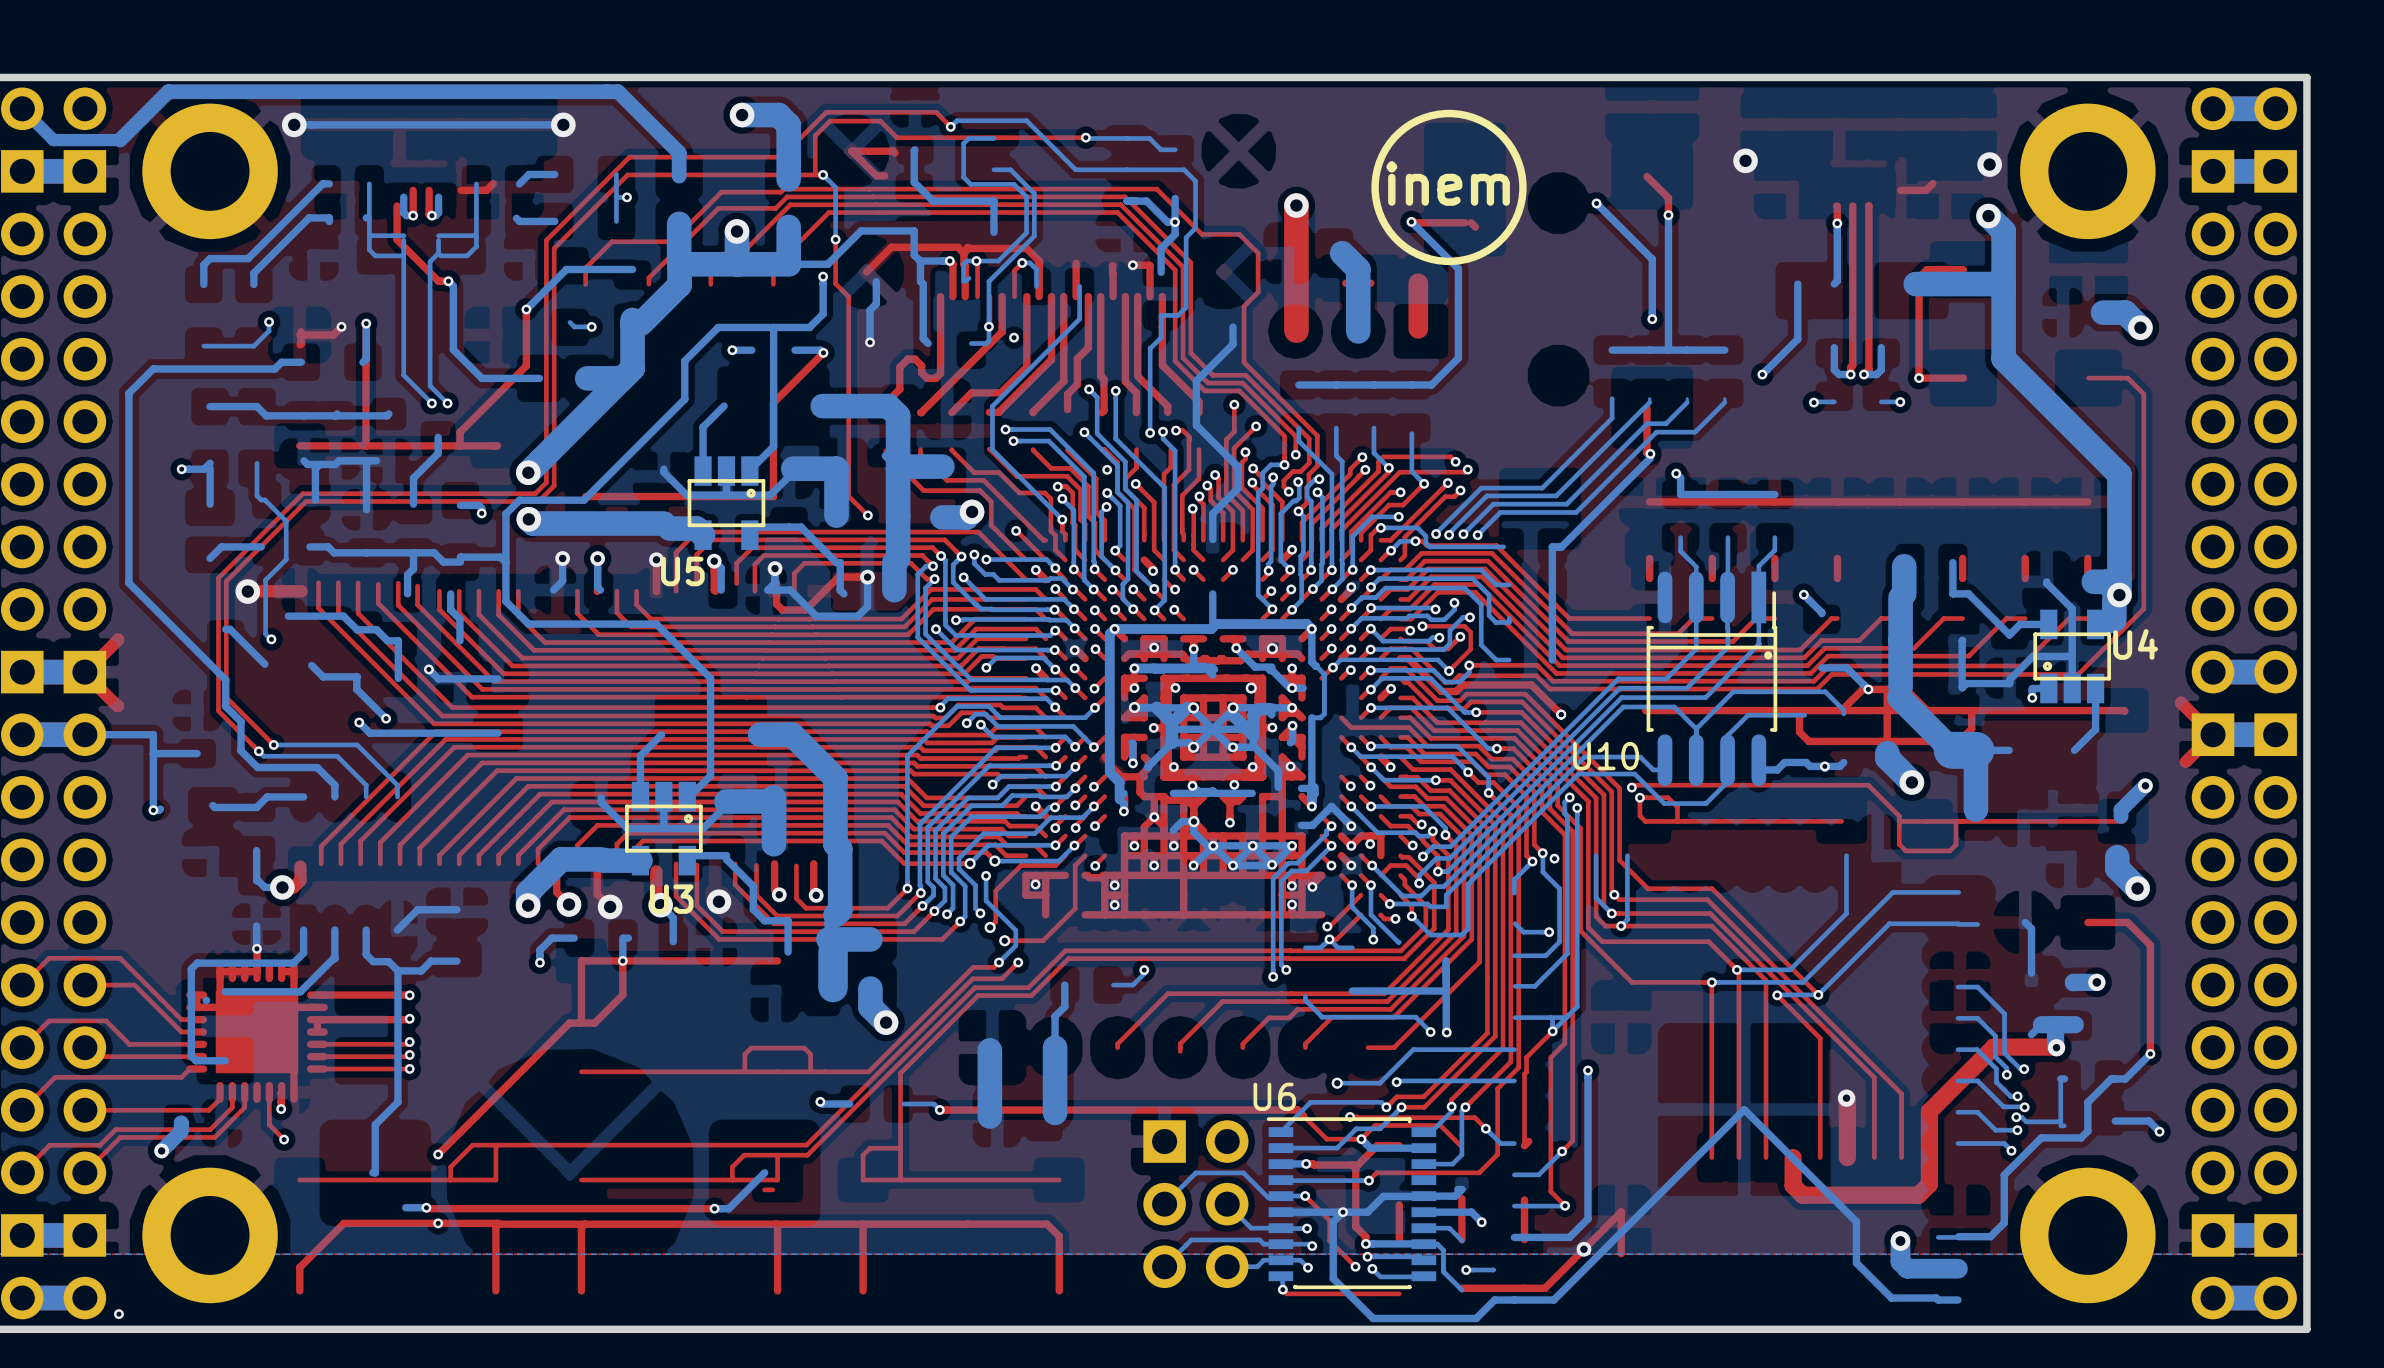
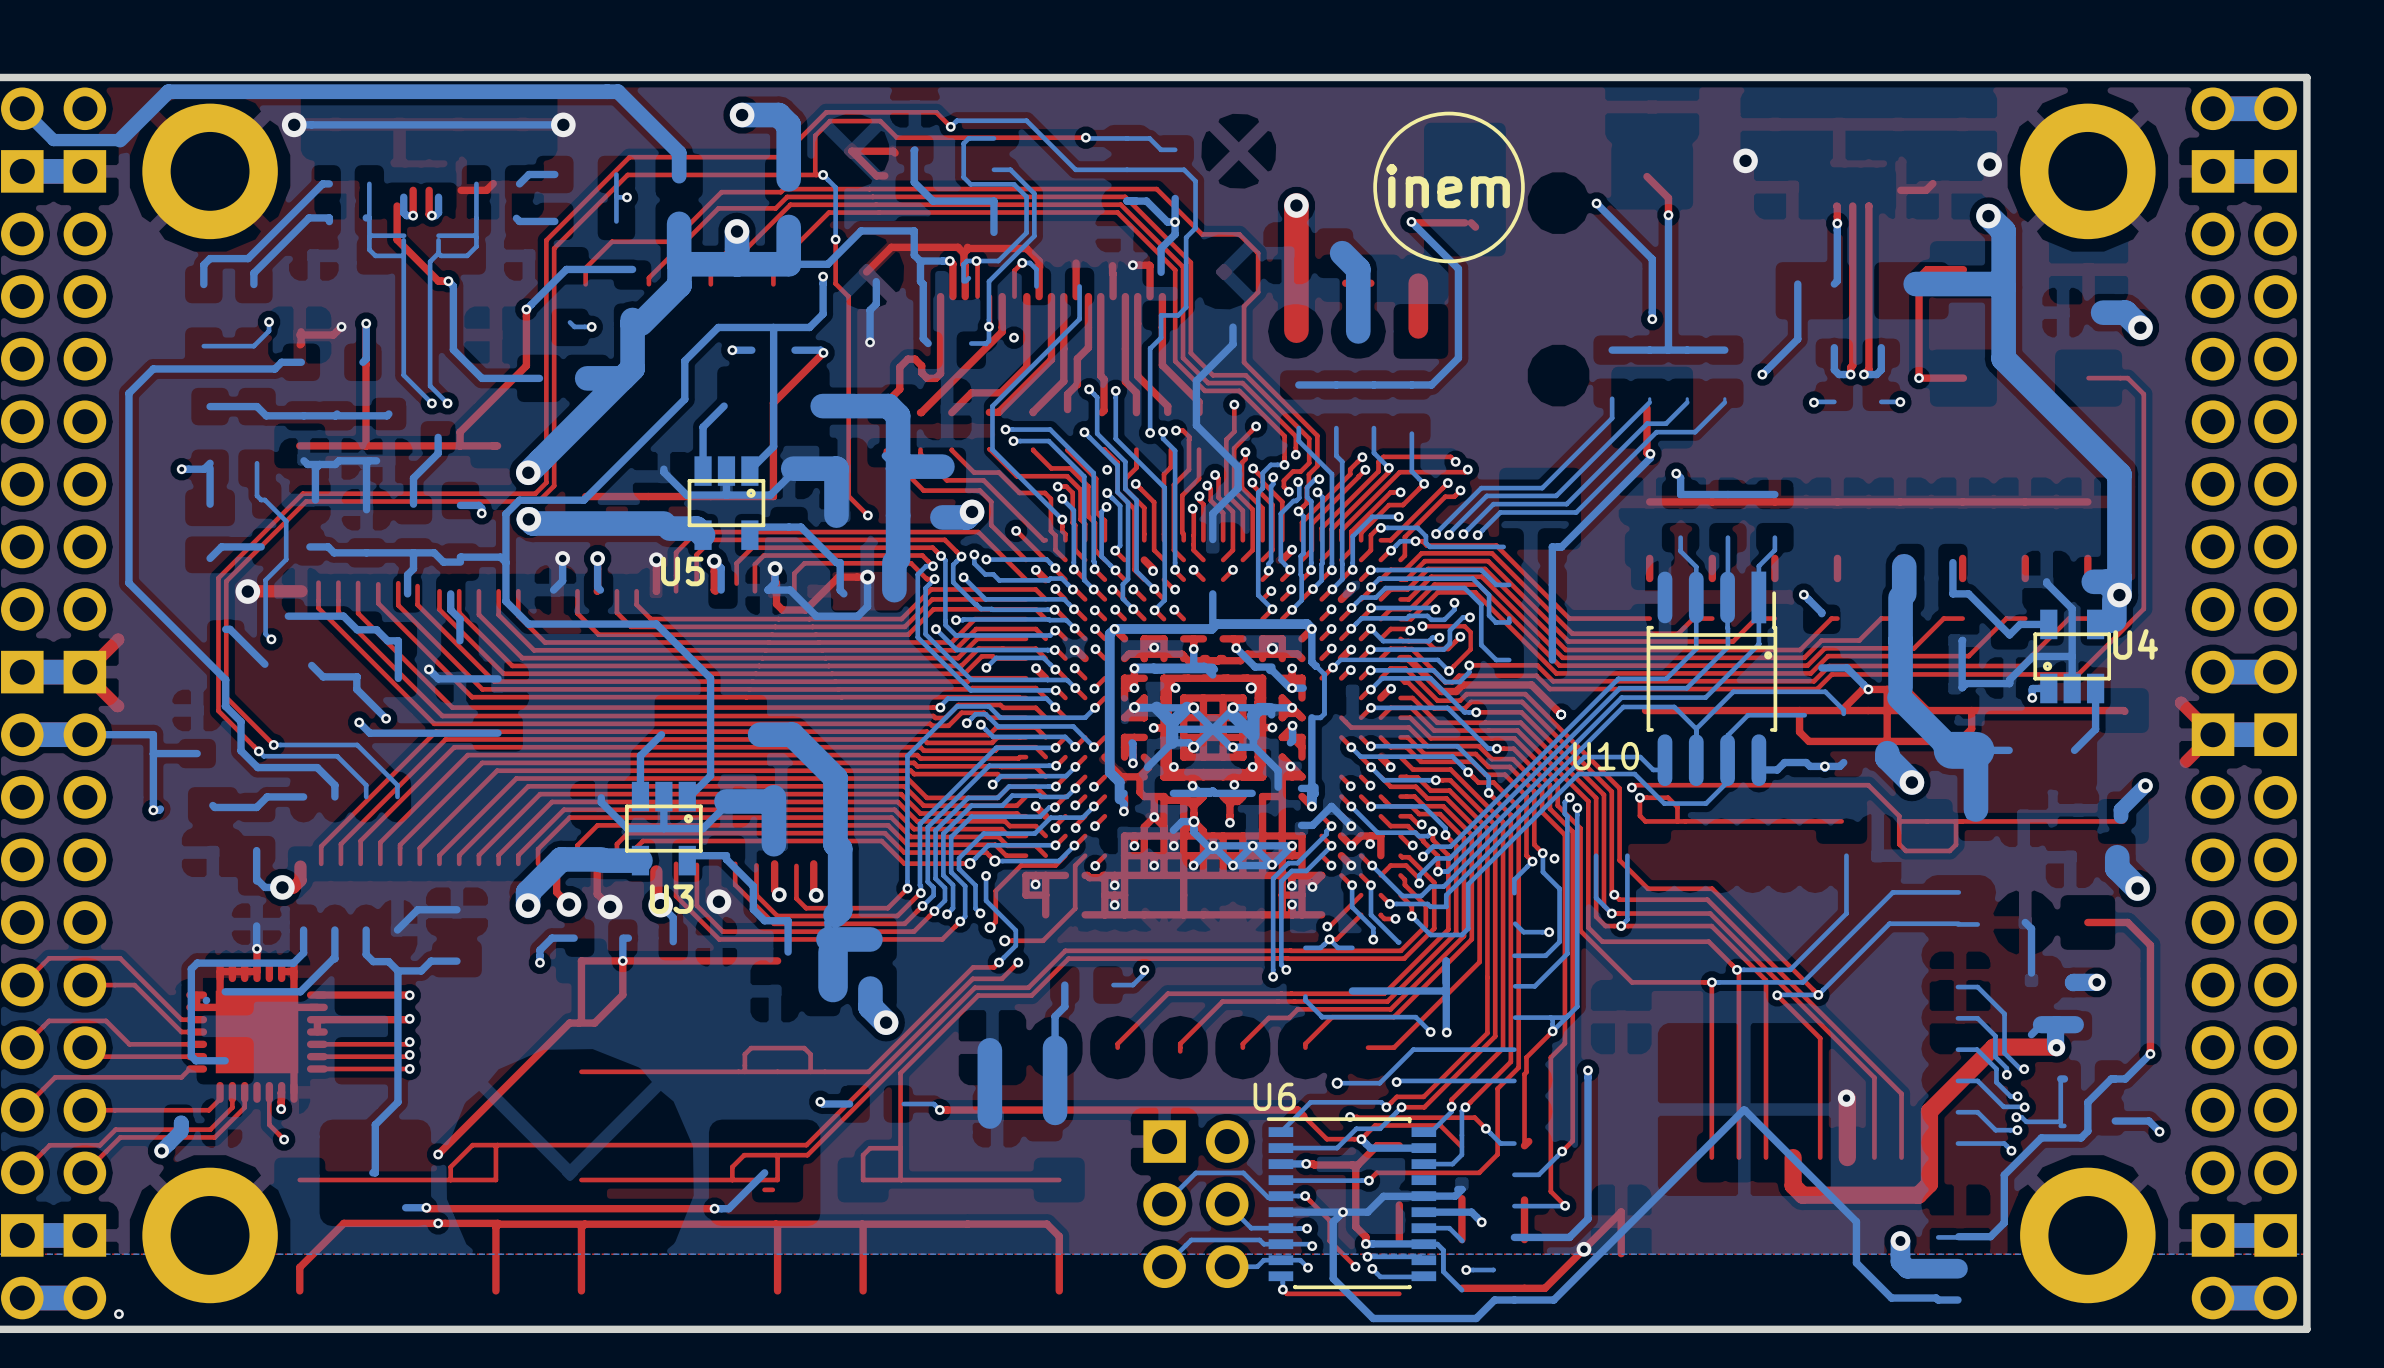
drawing shape: [1371, 109, 1527, 266] -> [1373, 111, 1525, 264]

